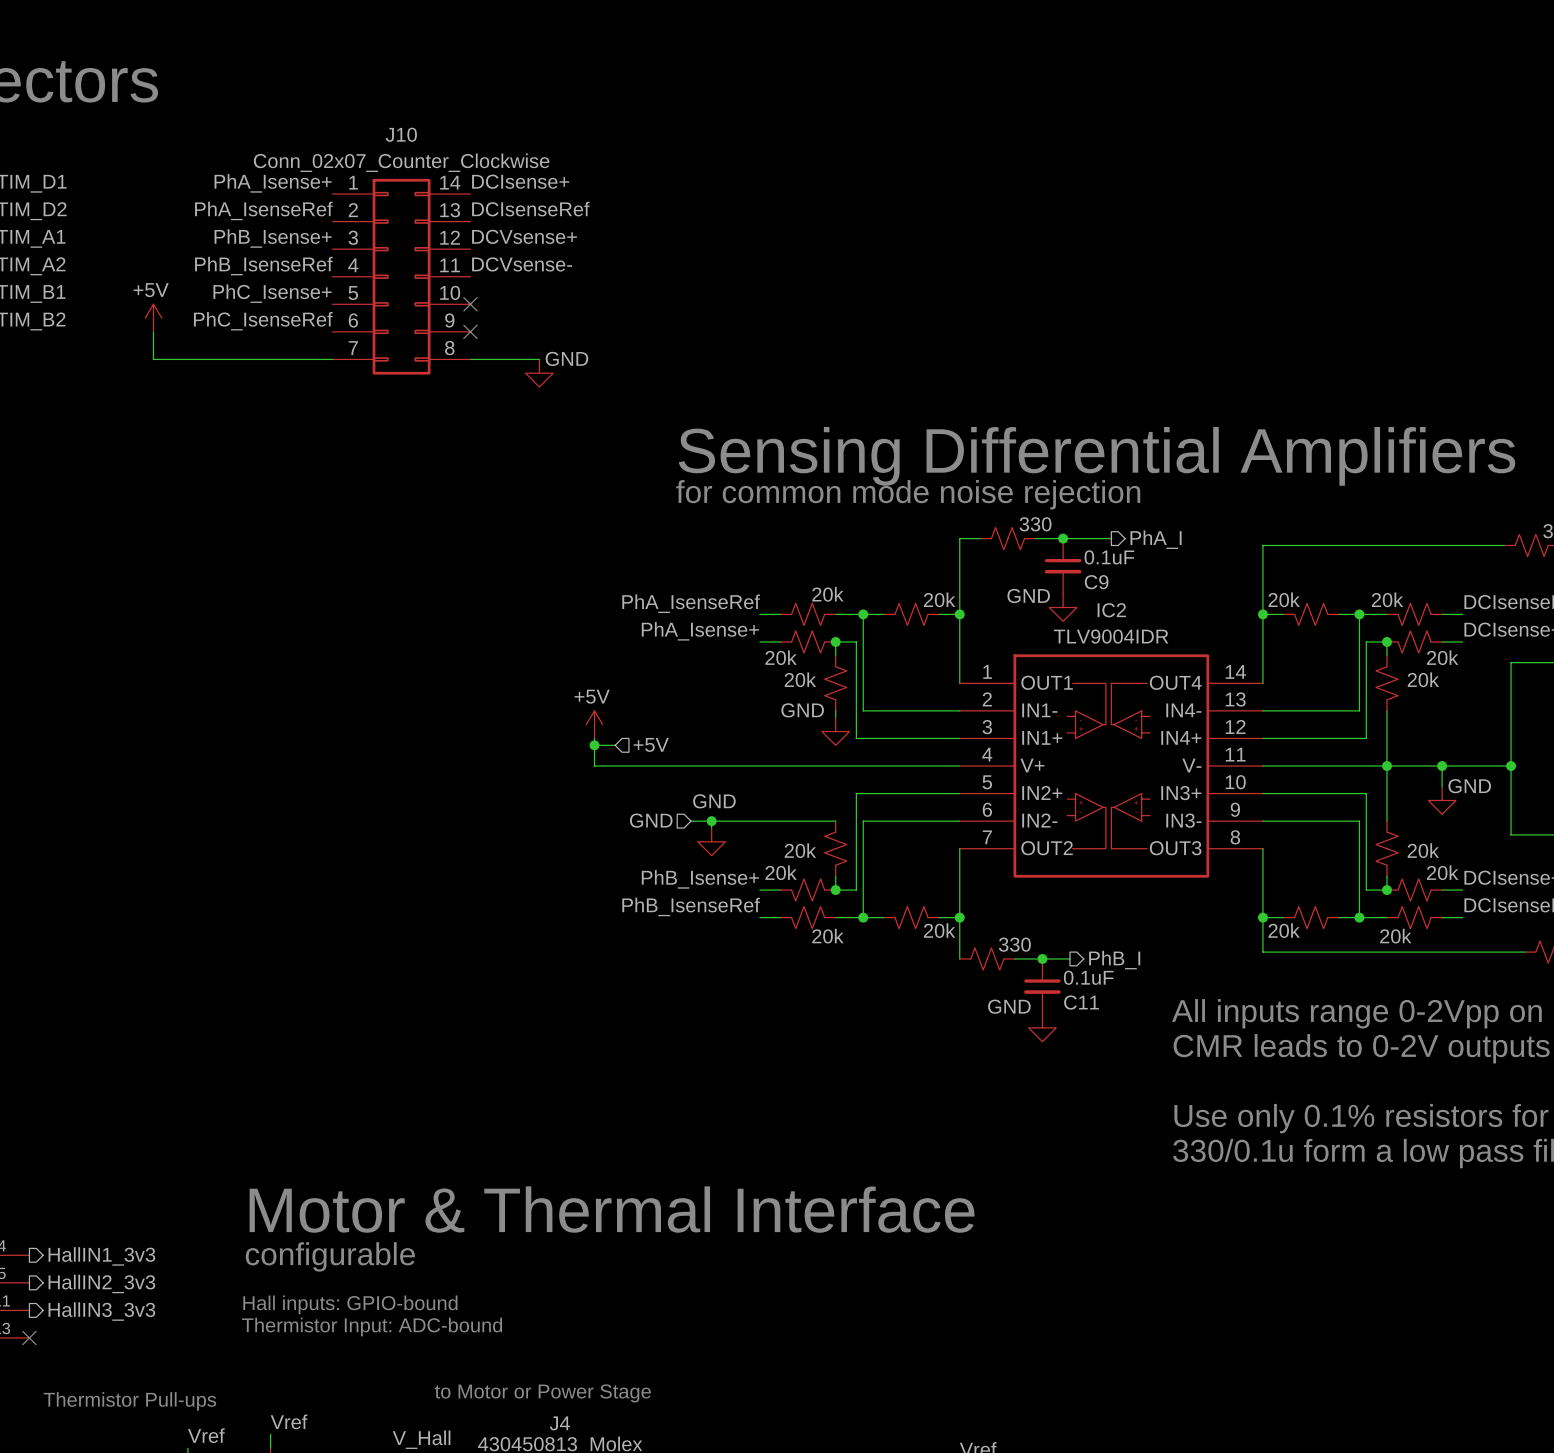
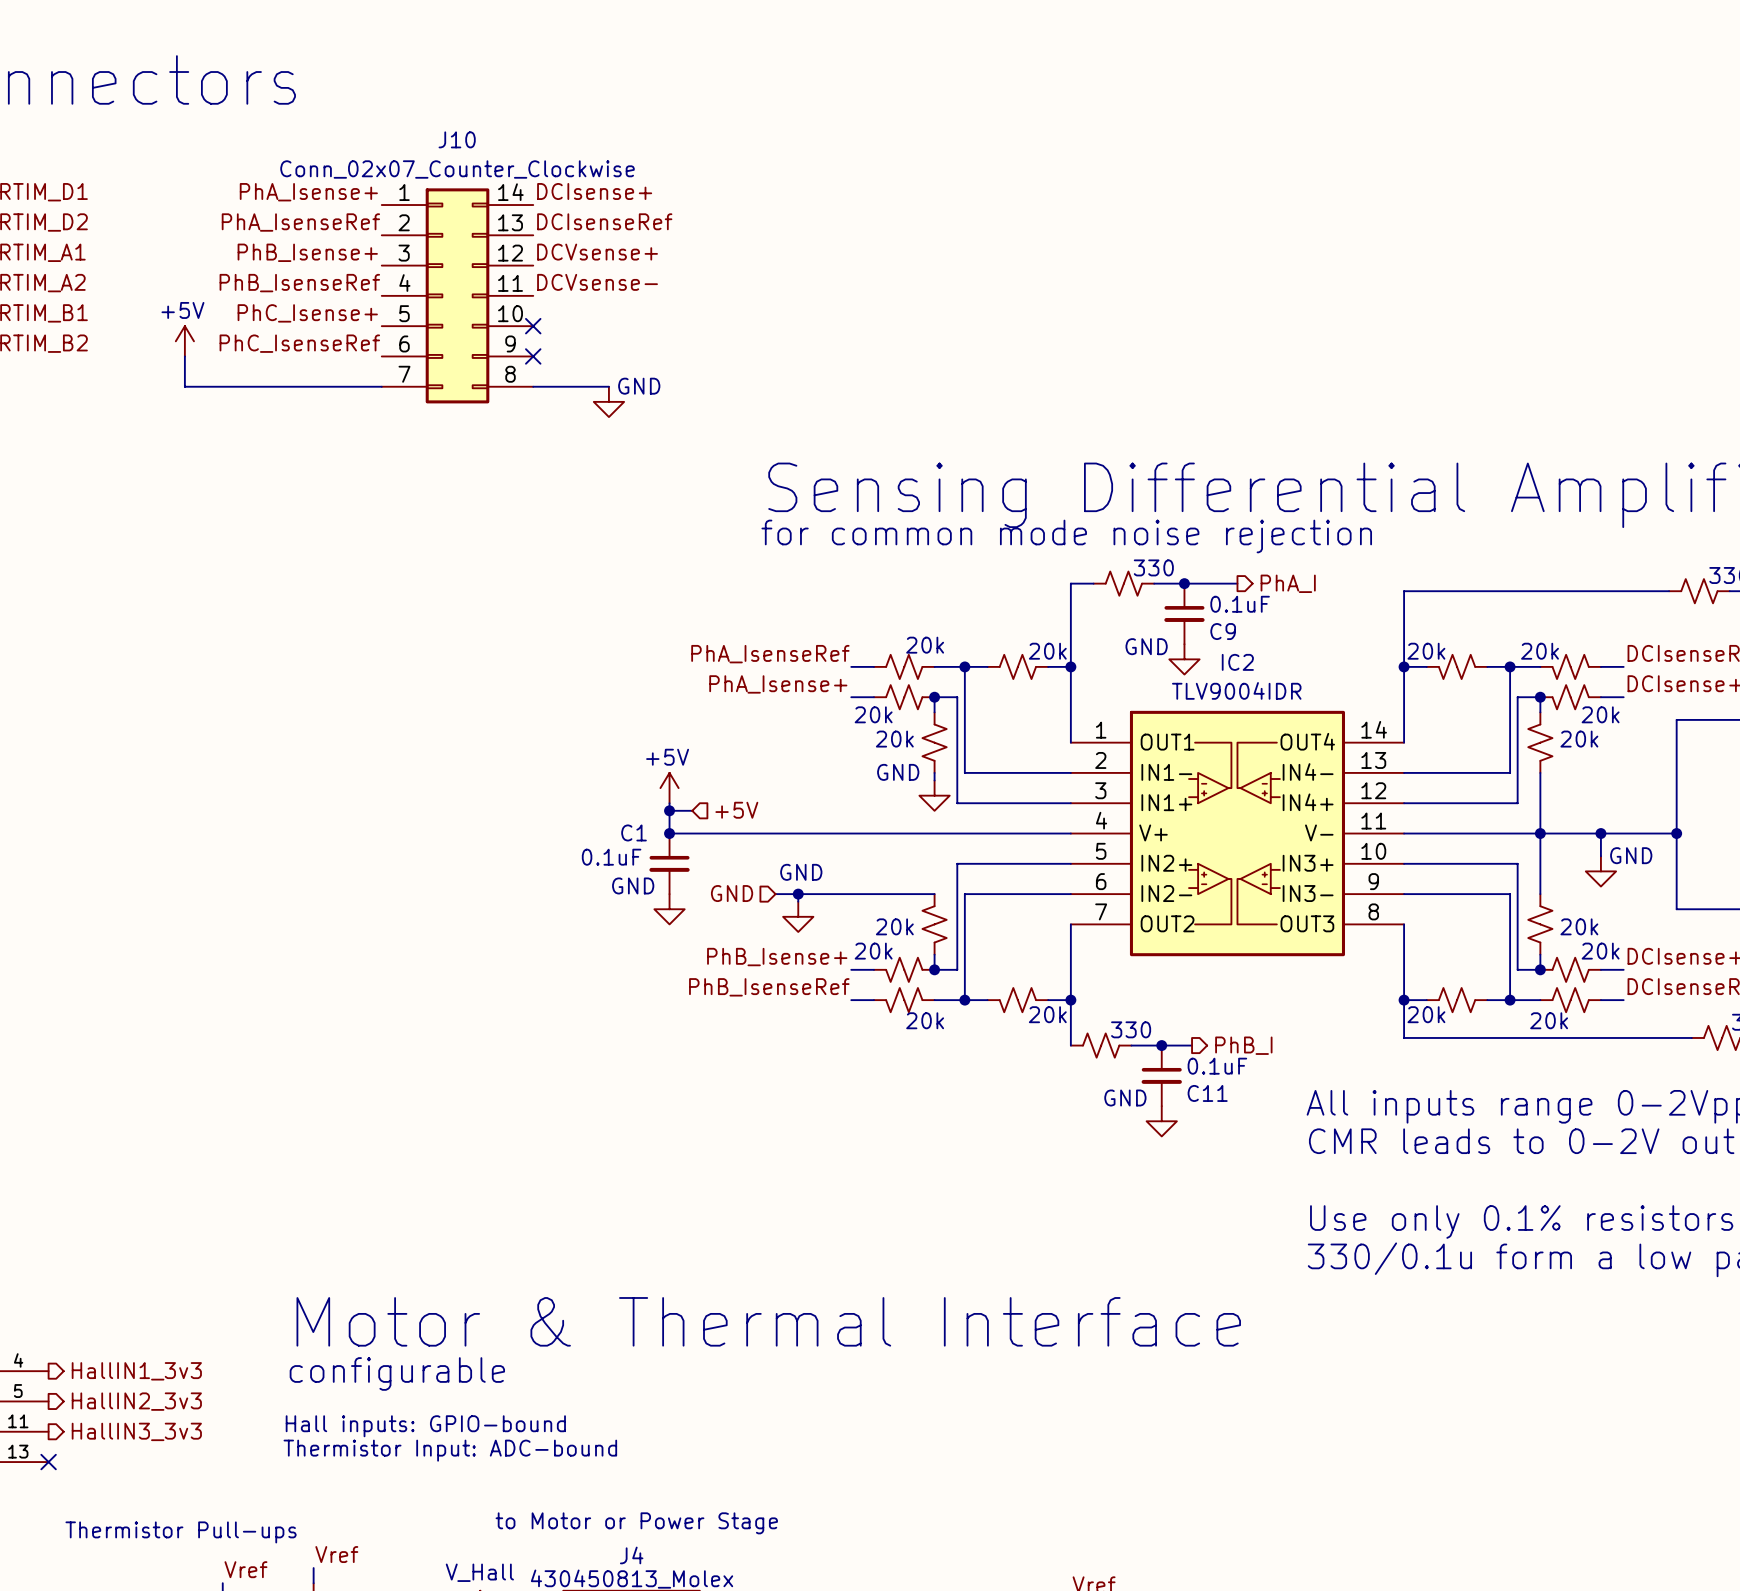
junction: none -> (669, 833)
C1: none -> 0.1uF (669, 863)
power symbol: none -> GND (669, 909)

